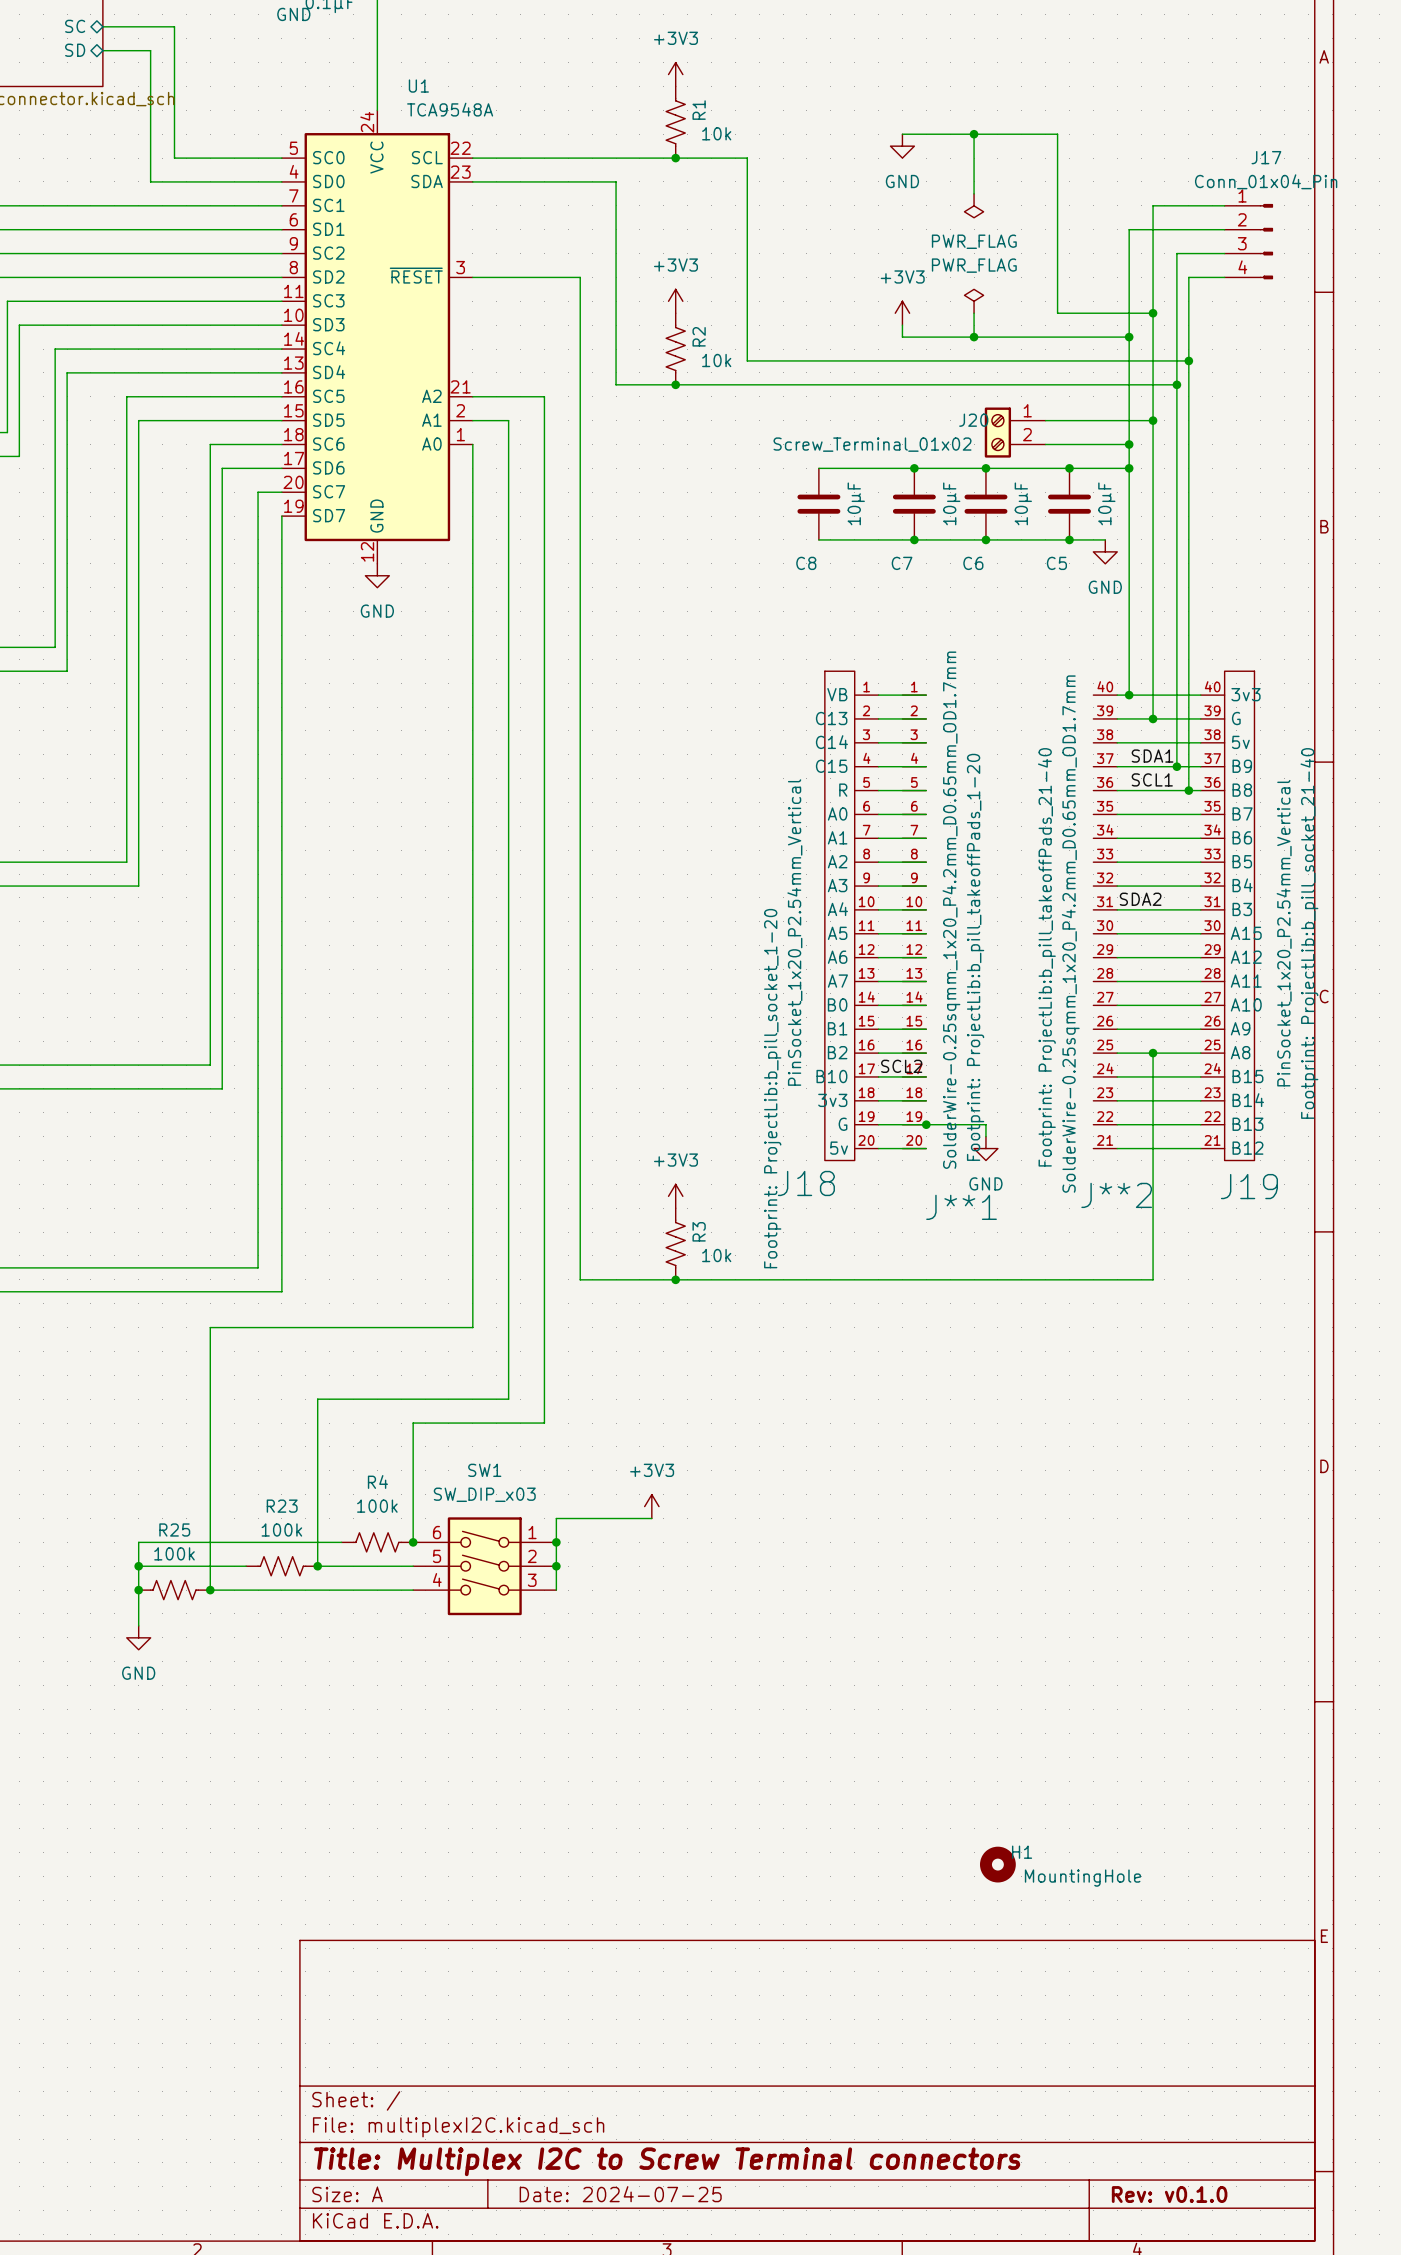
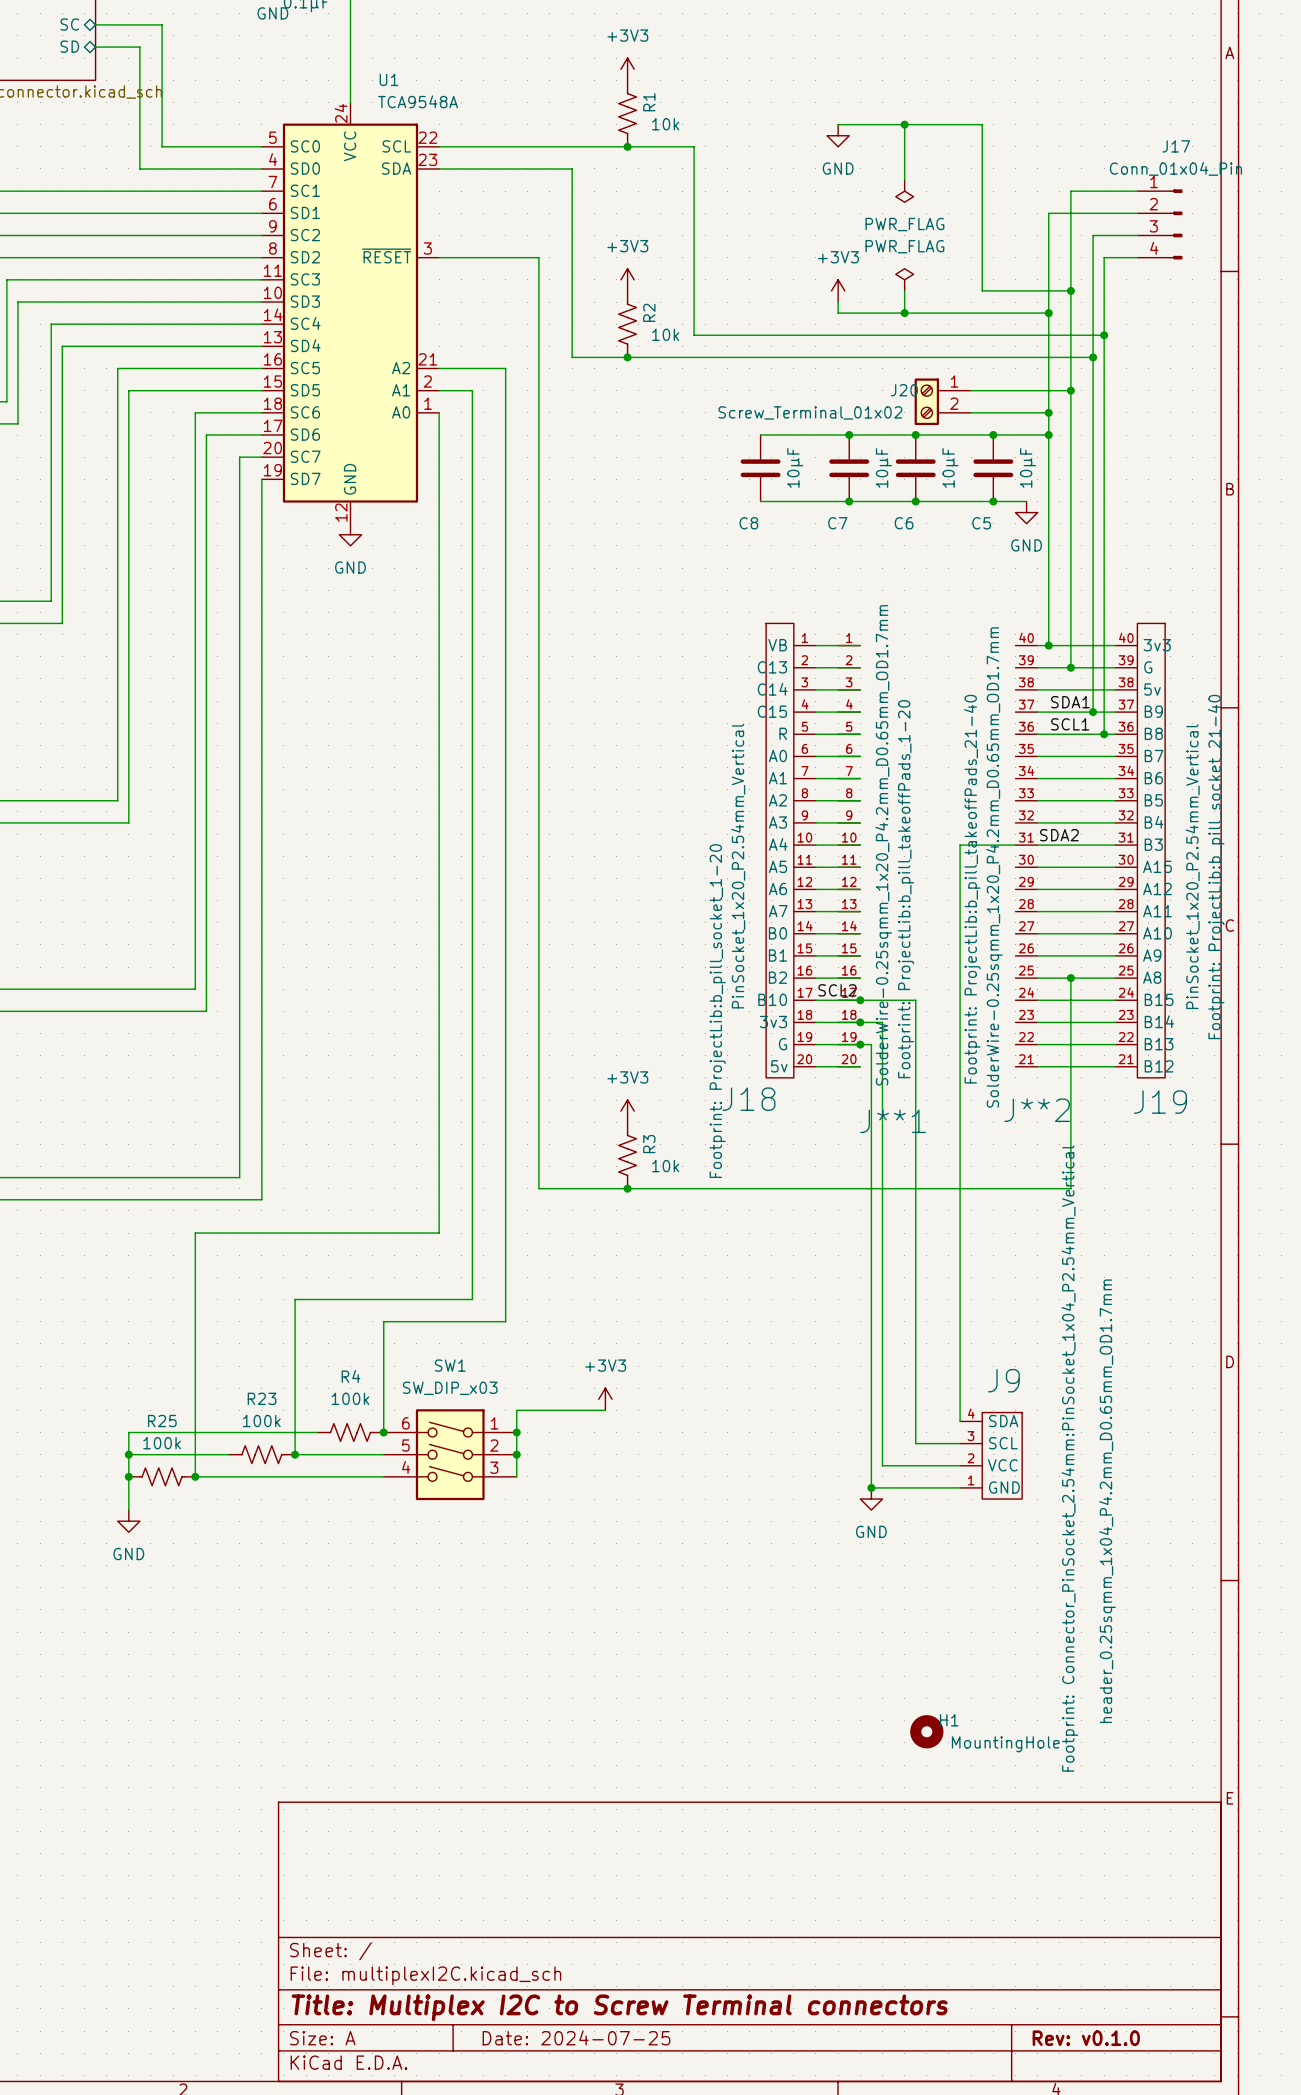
wire: none -> (1015, 845) (960, 845) (960, 1421)
junction: none -> (860, 1000)
wire: none -> (860, 1022) (882, 1022) (882, 1465) (960, 1465)
junction: none -> (860, 1022)
wire: (938, 1124) (985, 1124) -> (860, 1000) (915, 1000) (915, 1044)
wire: none -> (871, 1044) (871, 1487) (960, 1487)
wire: none -> (915, 1055) (915, 1443) (960, 1443)
power symbol: GND (985, 1148) -> none
J9: none -> header_0.25sqmm_1x04_P4.2mm_D0.65mm_OD1.7mm (991, 1455)
junction: none -> (871, 1487)
power symbol: none -> GND (871, 1499)

